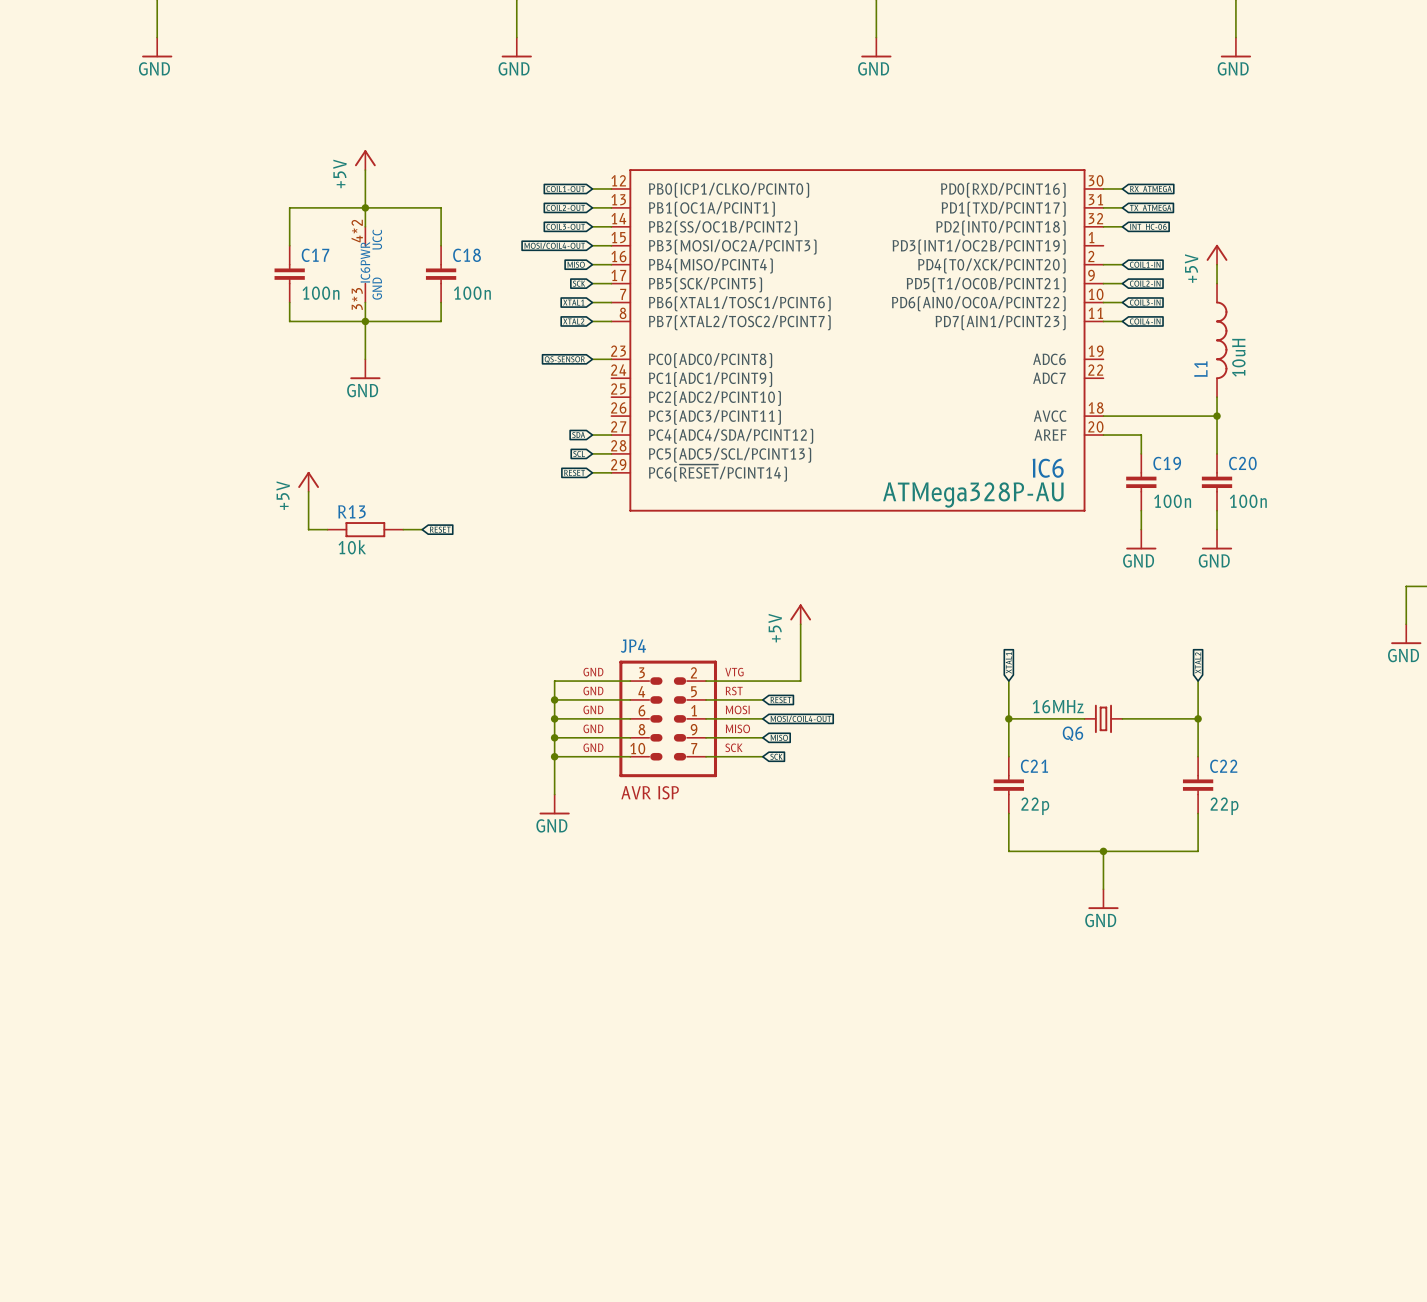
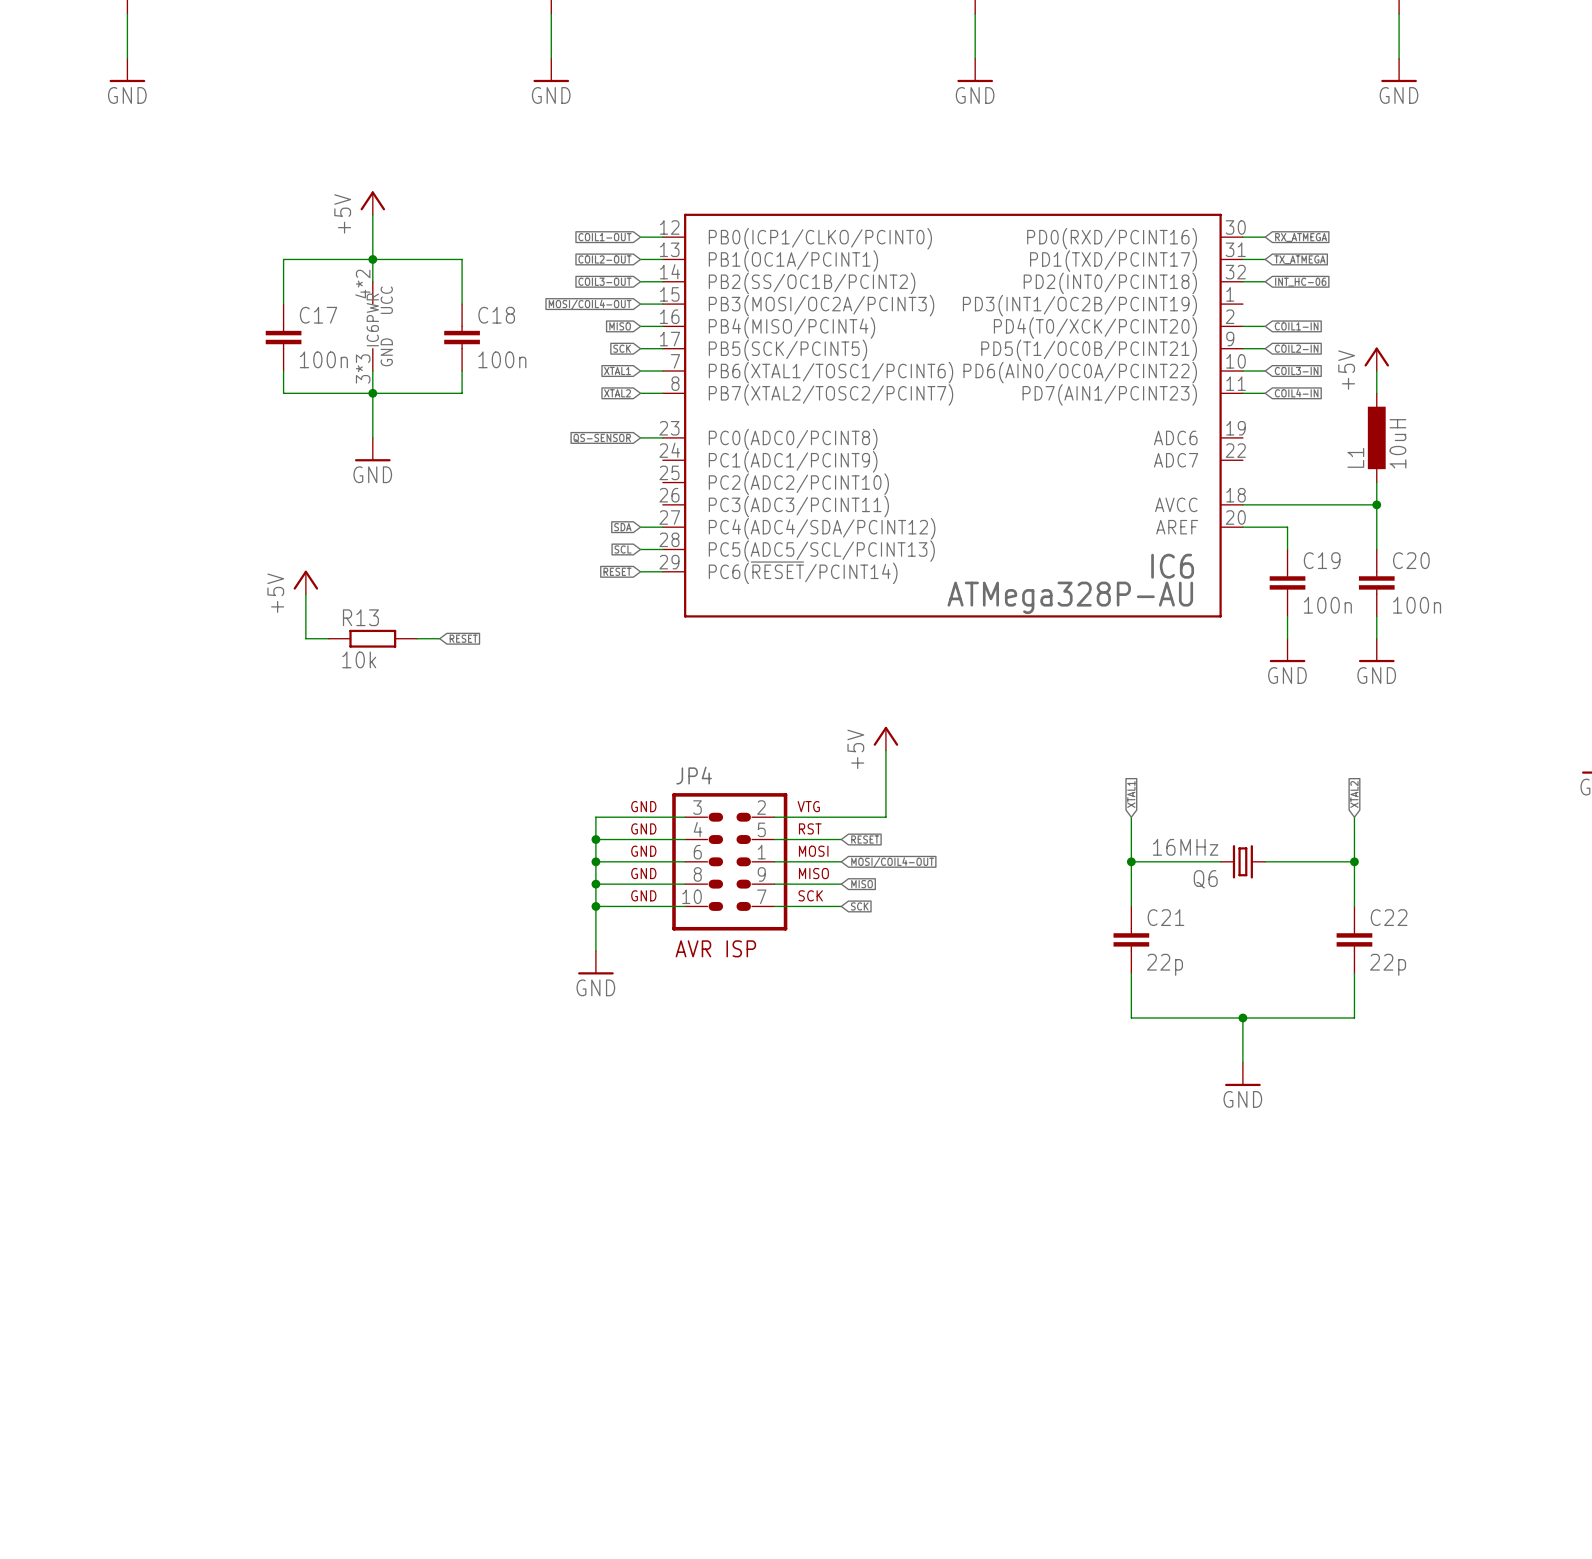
power symbol position: +5V (1217, 254) -> +5V (1376, 359)
wire: (1217, 264) (1217, 283) -> (1376, 371) (1376, 393)
L1 symbol: [1216, 283, 1228, 398] -> [1367, 393, 1386, 483]

